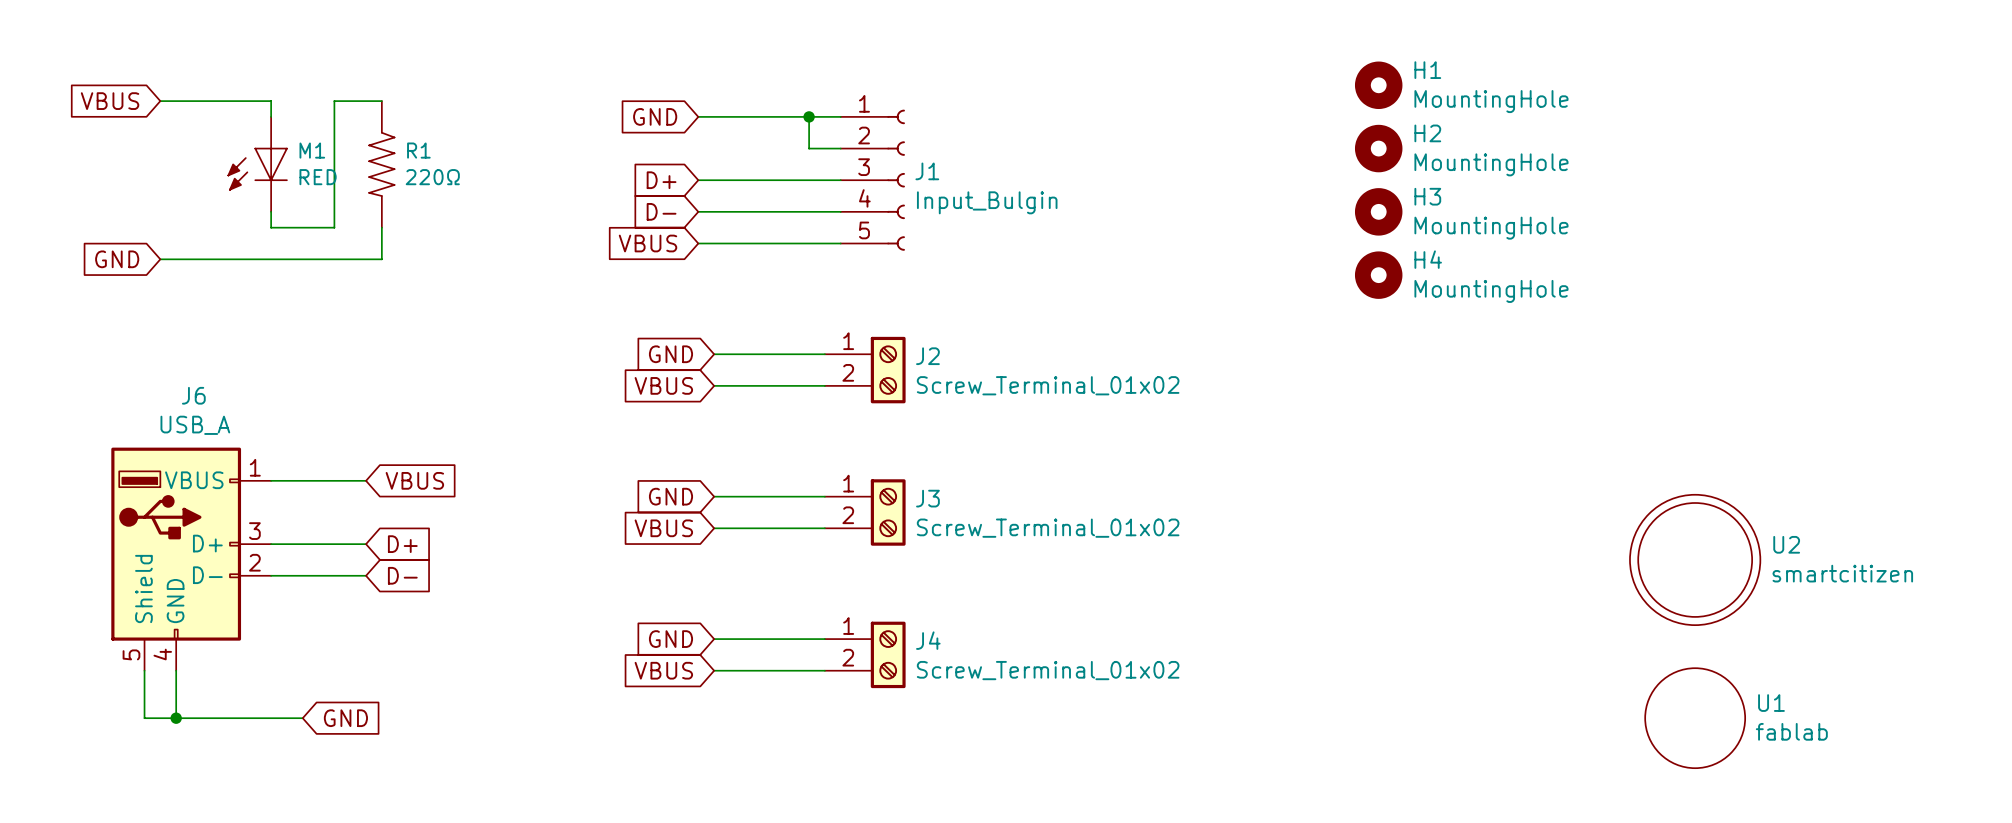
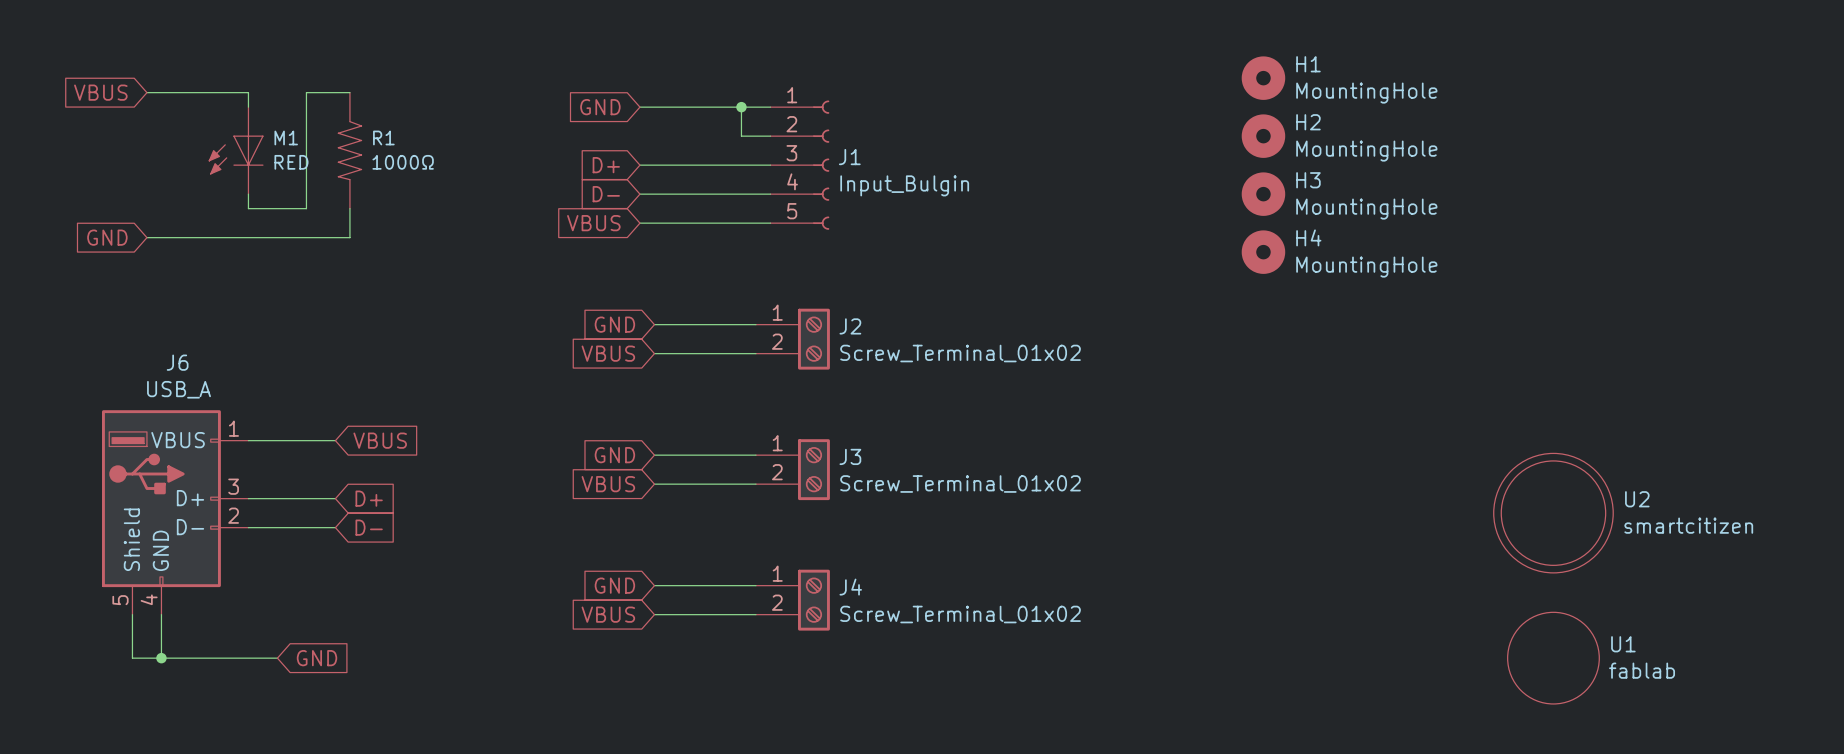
R1 value: 220Ω (432, 177) -> 1000Ω (403, 162)

